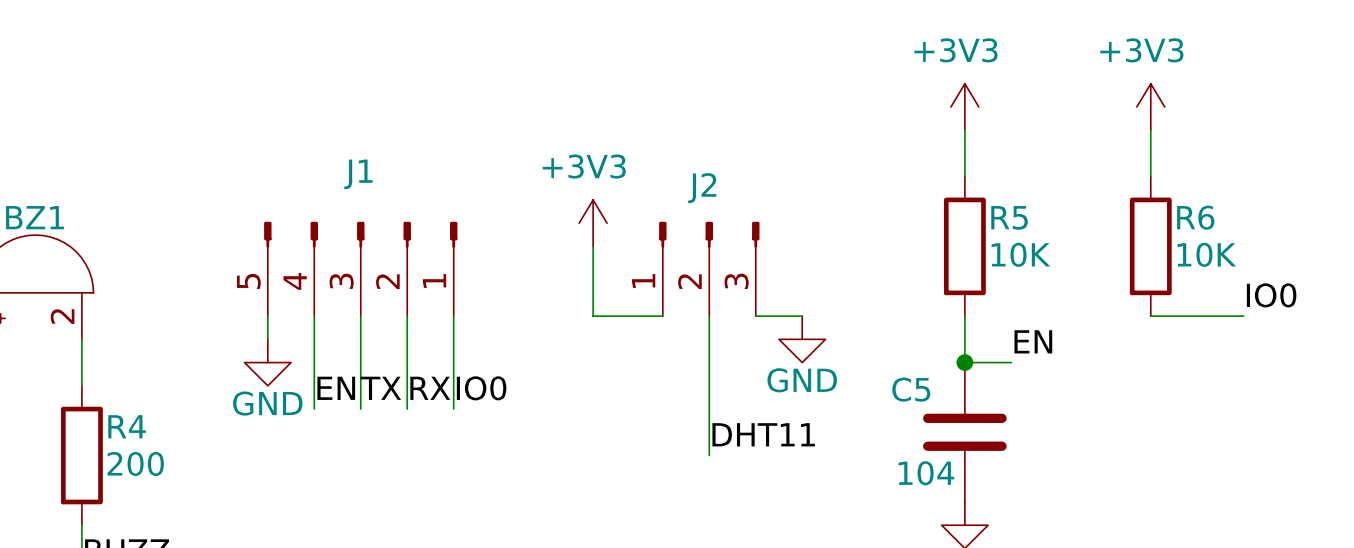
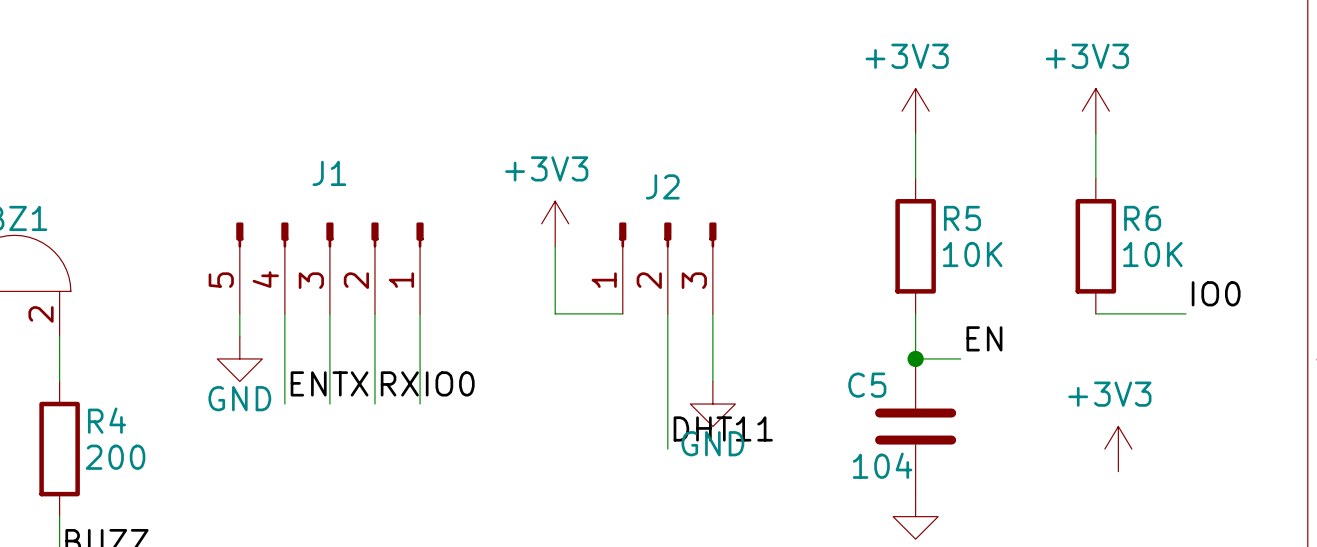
wire: (755, 316) (802, 316) -> (712, 313) (712, 381)
power symbol position: GND (802, 339) -> GND (712, 404)
power symbol: none -> +3V3 (1118, 449)

